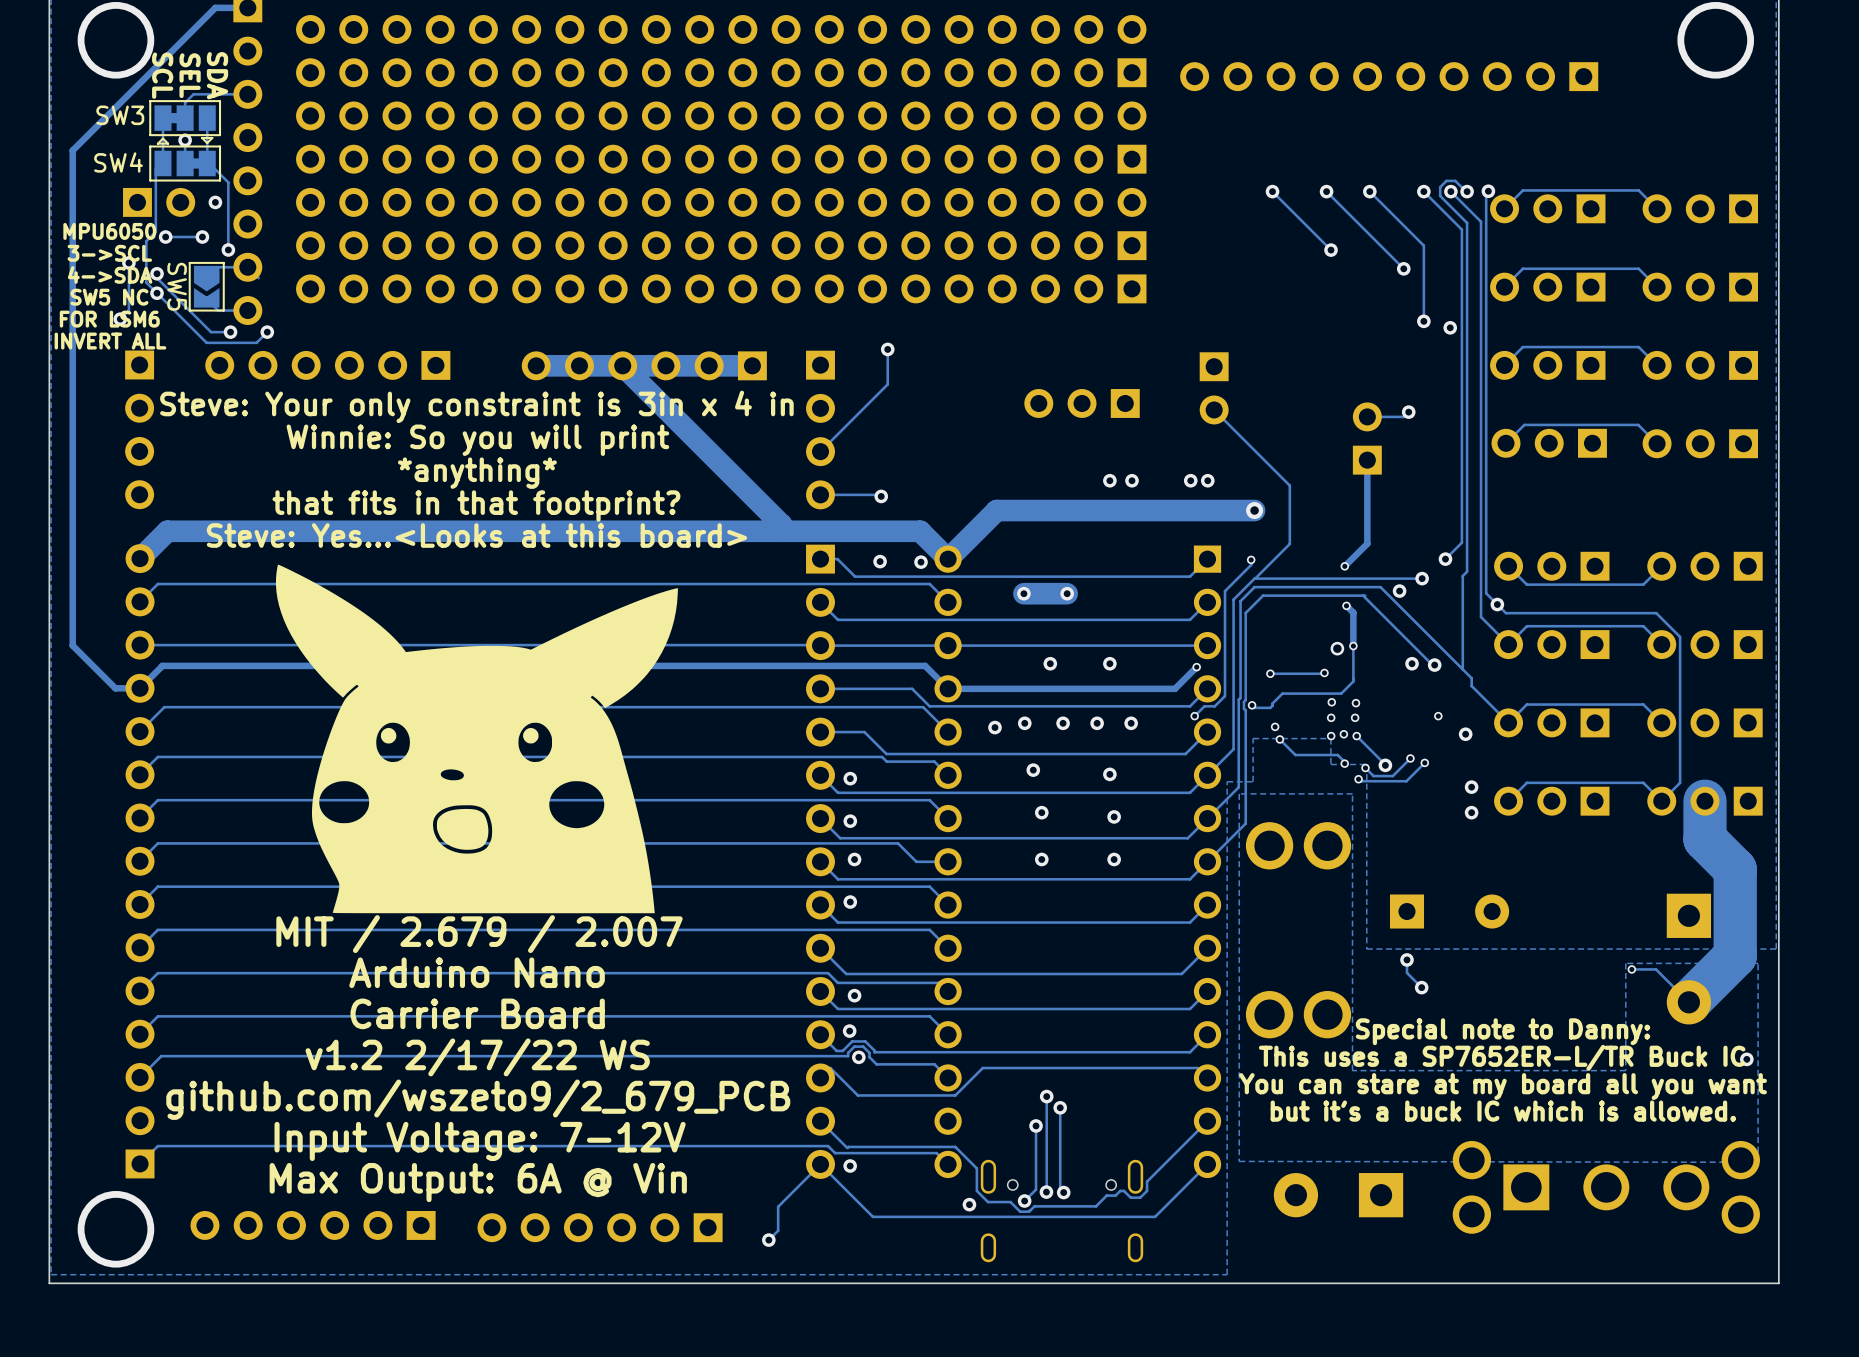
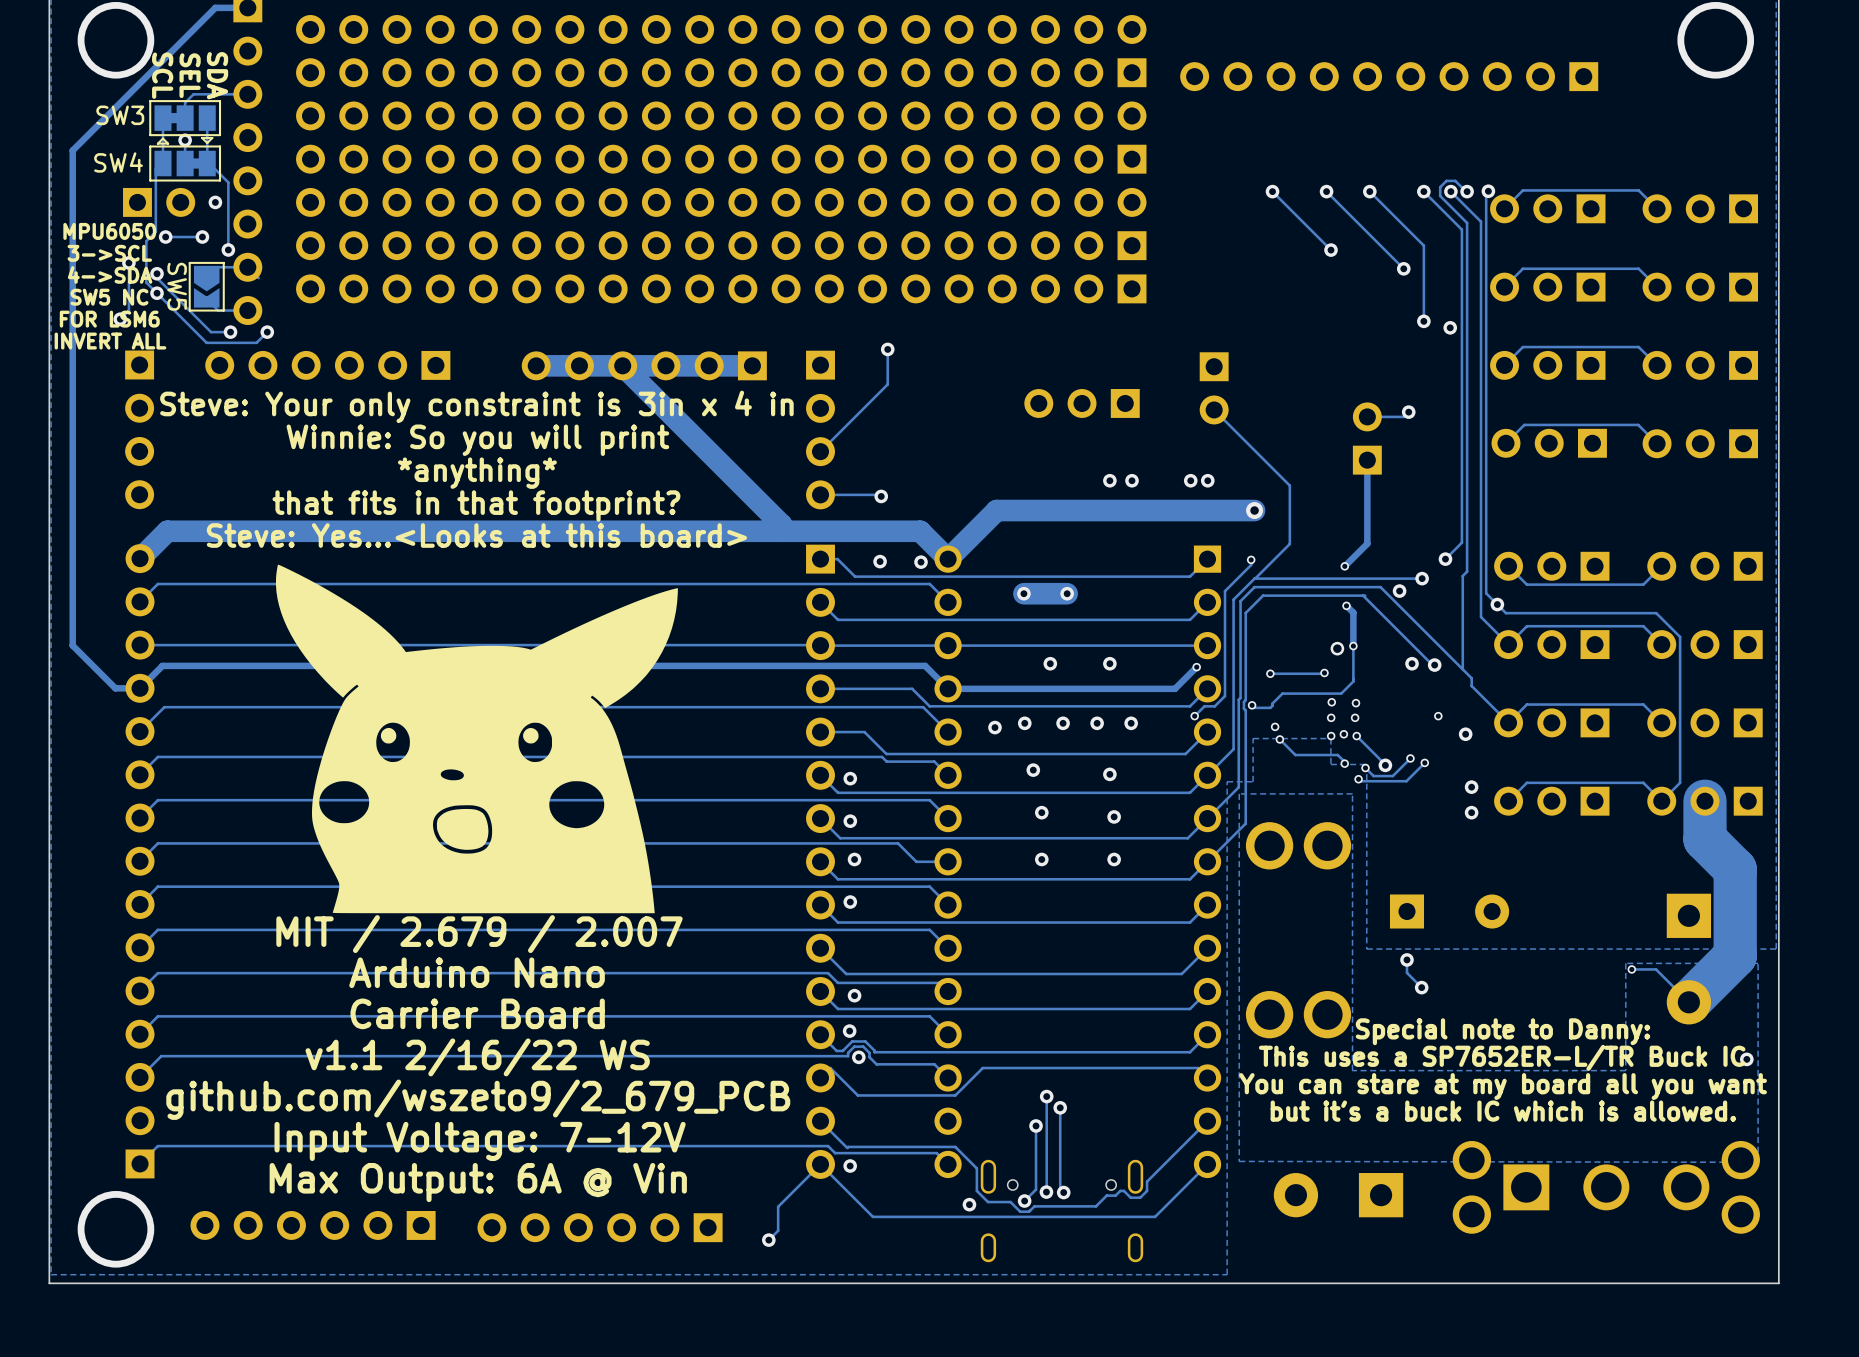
text: v1.2 2/17/22 WS (477, 1057) -> v1.1 2/16/22 WS (477, 1057)

